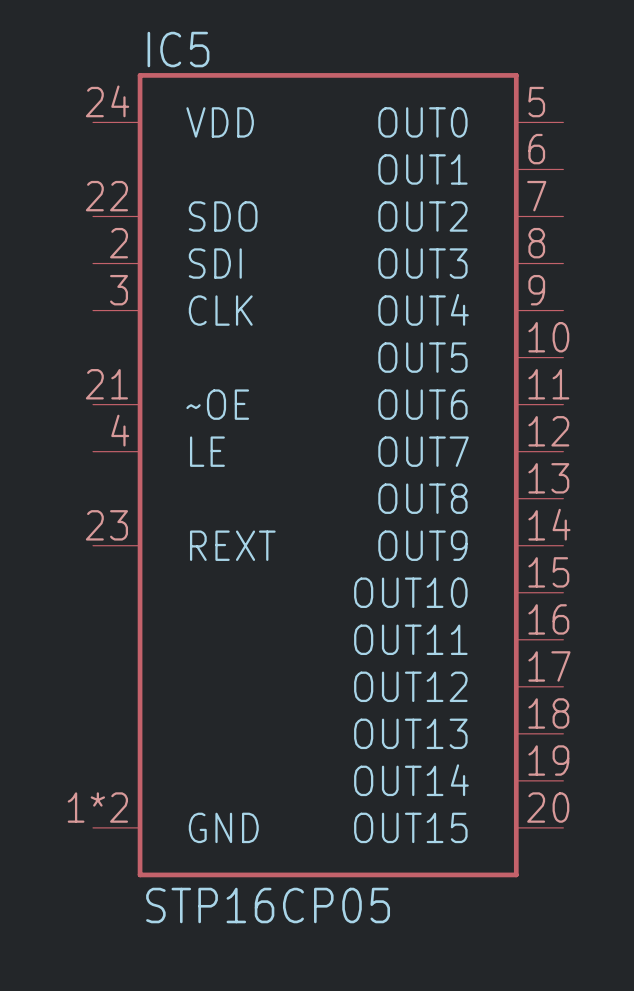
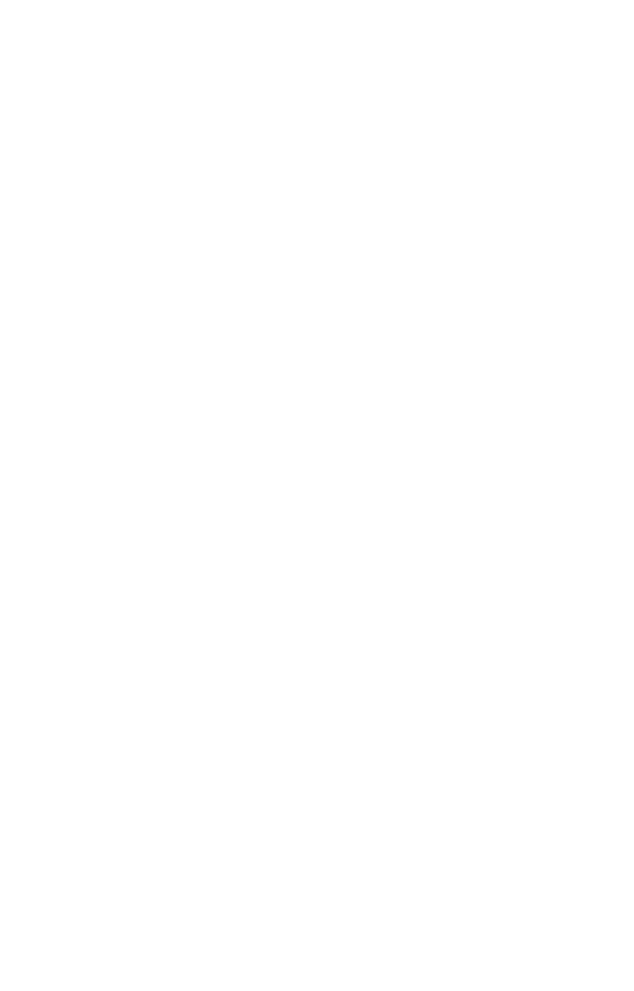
IC5: STP16CP05 (328, 475) -> none

